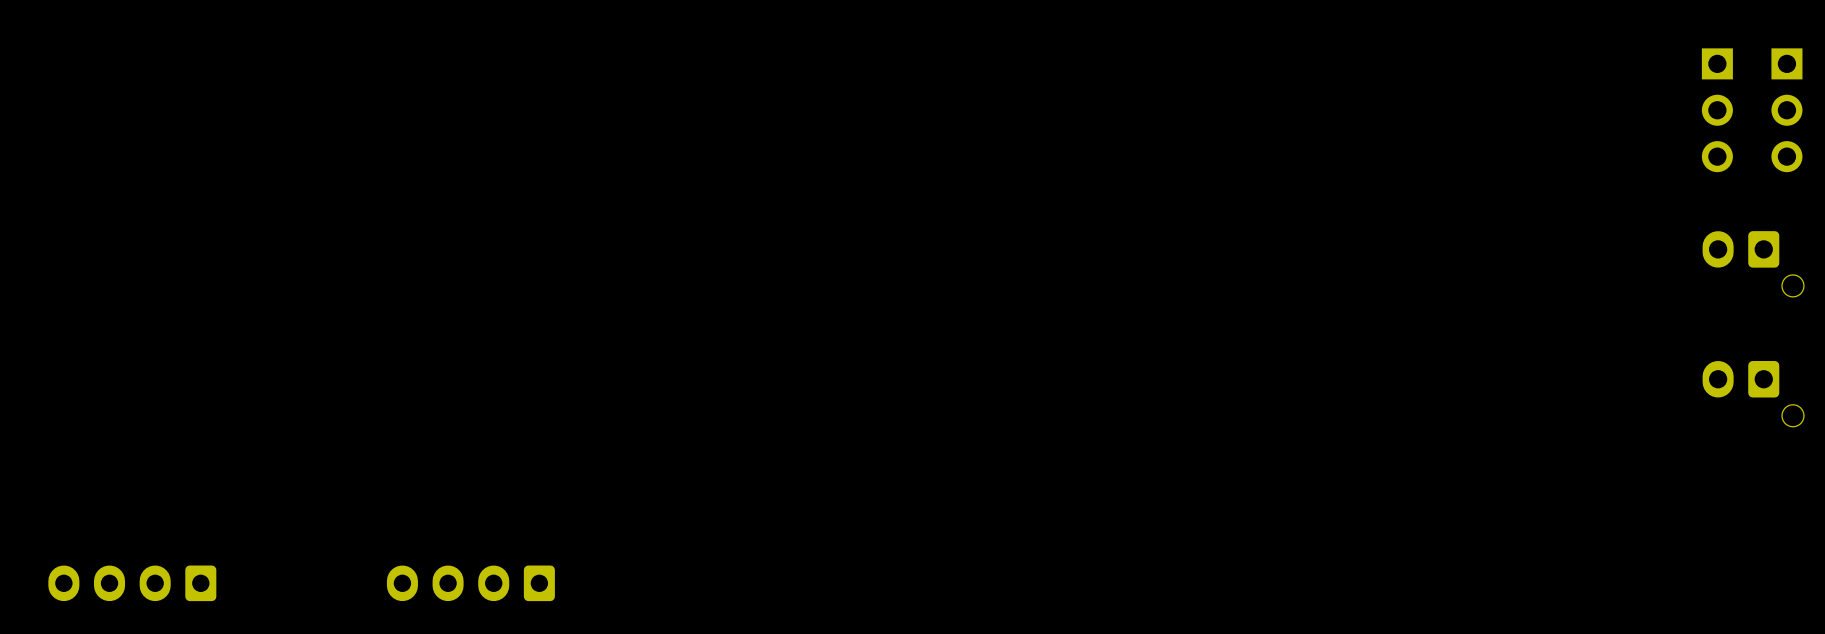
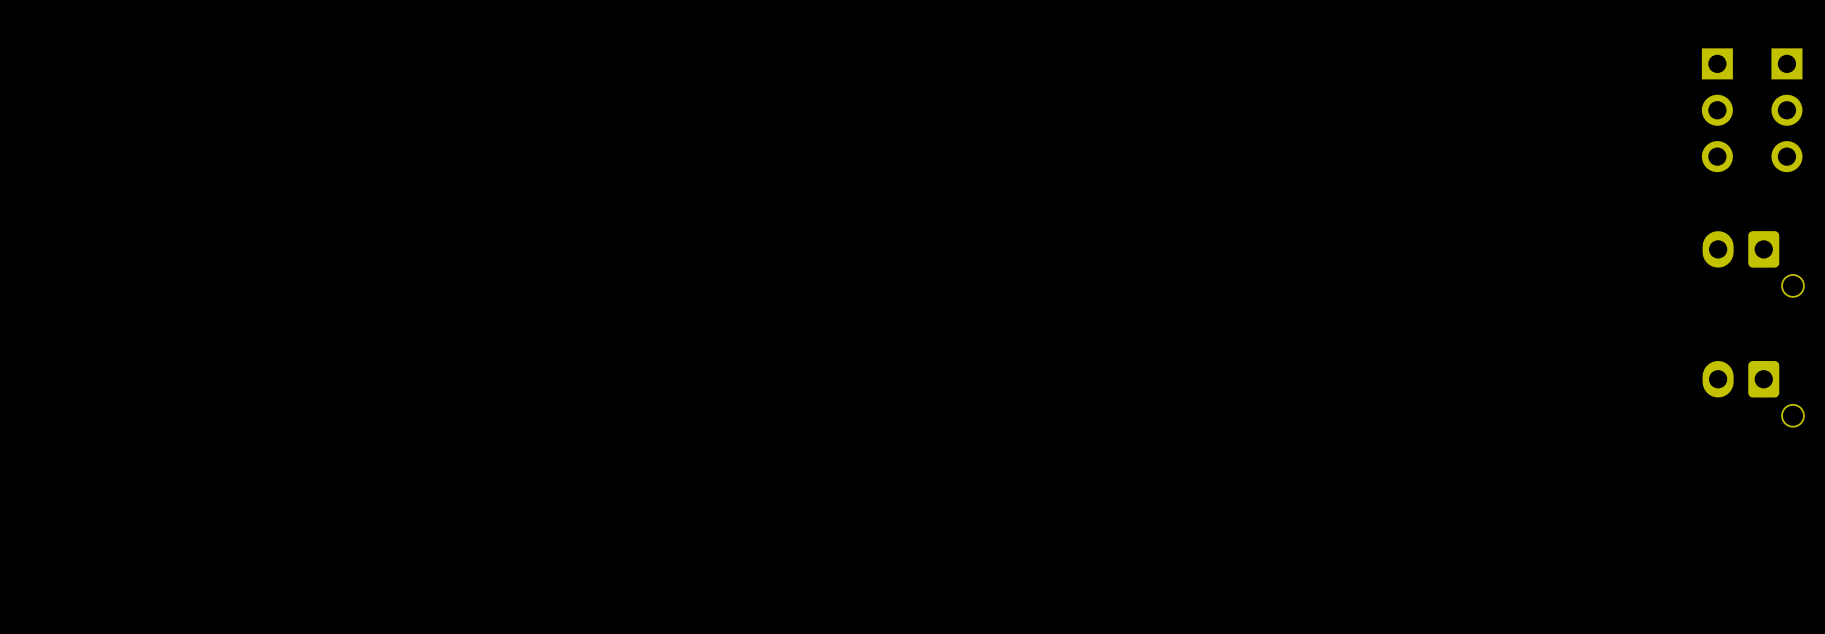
part: (132, 583) -> none
part: (470, 583) -> none

